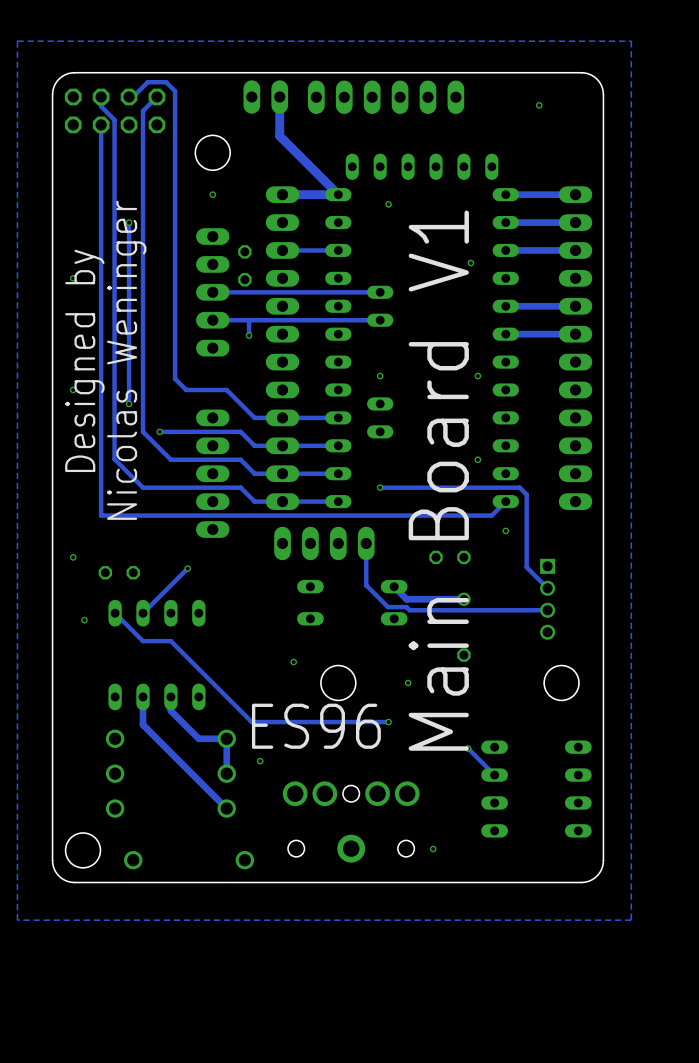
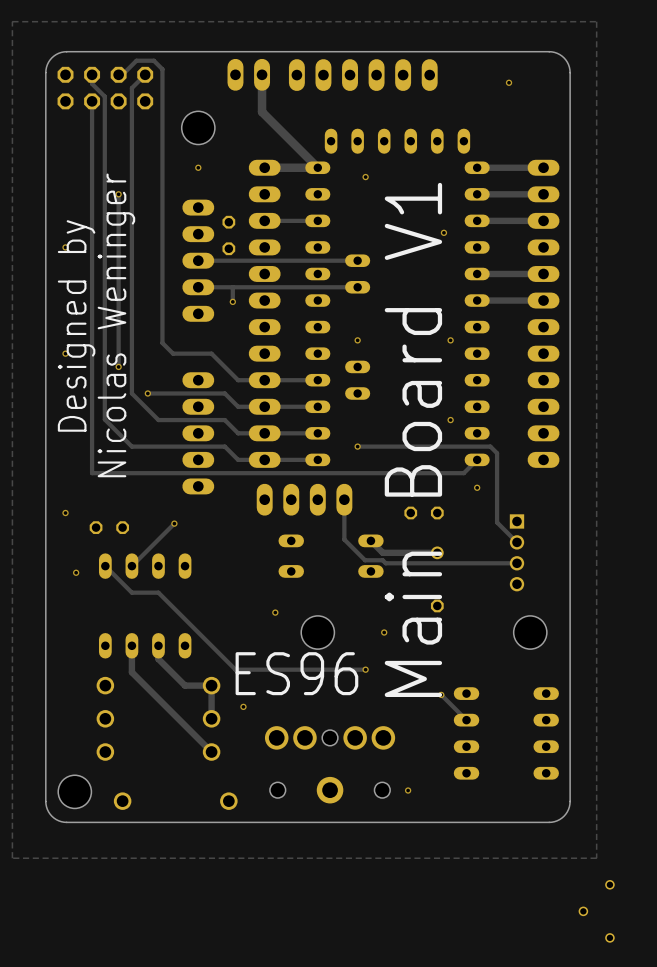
part: none -> (596, 911)

